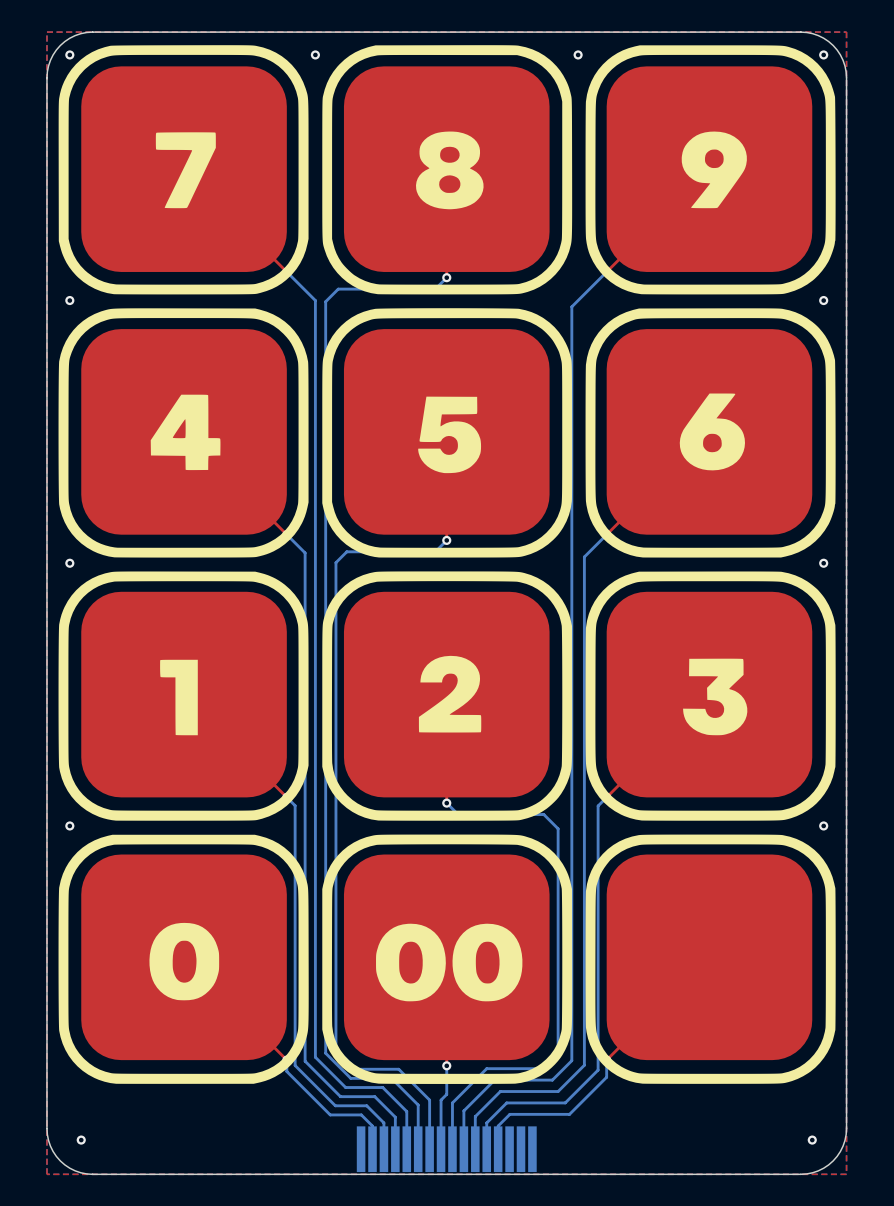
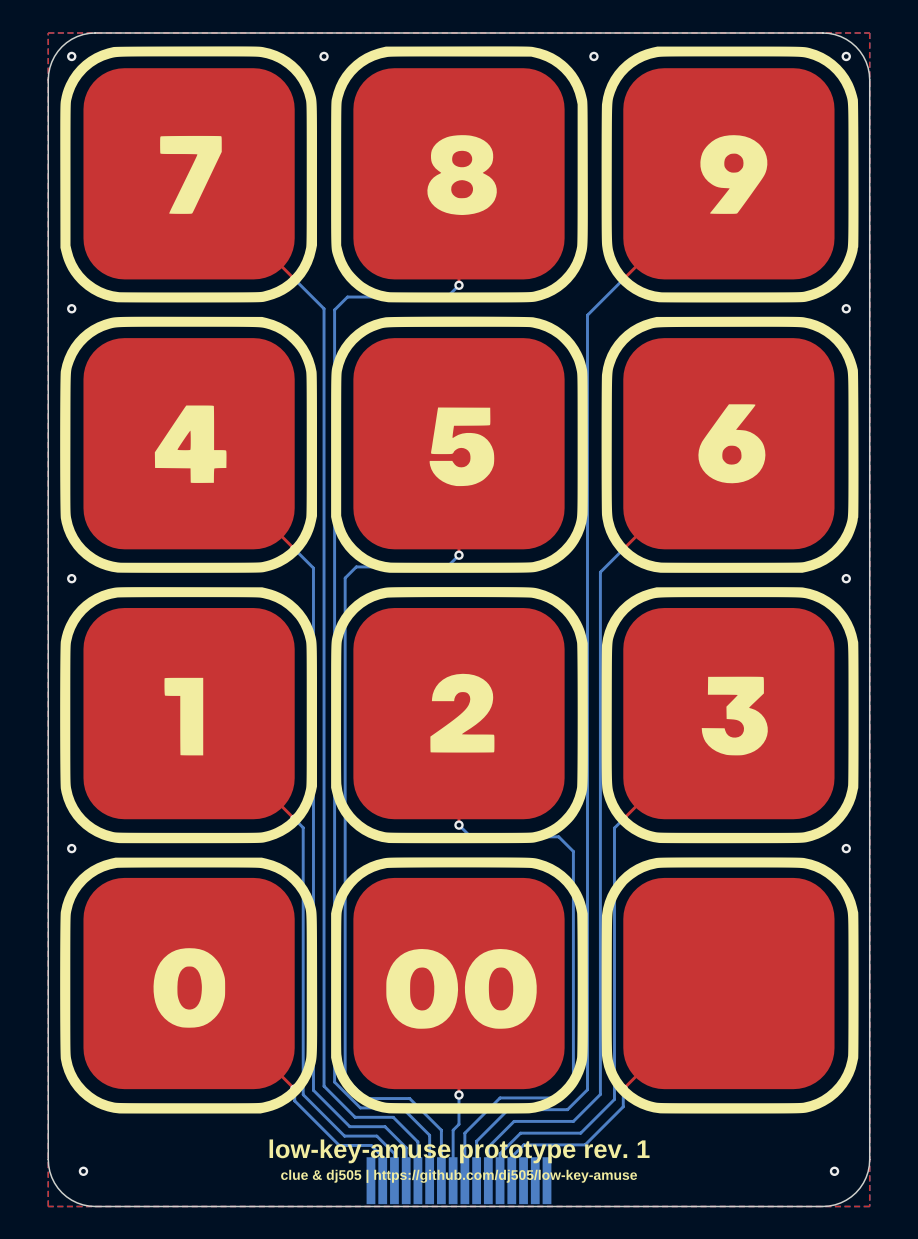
text: none -> low-key-amuse prototype rev. 1 (459, 1151)
text: none -> clue & dj505 | https://github.com/dj505/low-key-amuse (459, 1176)

